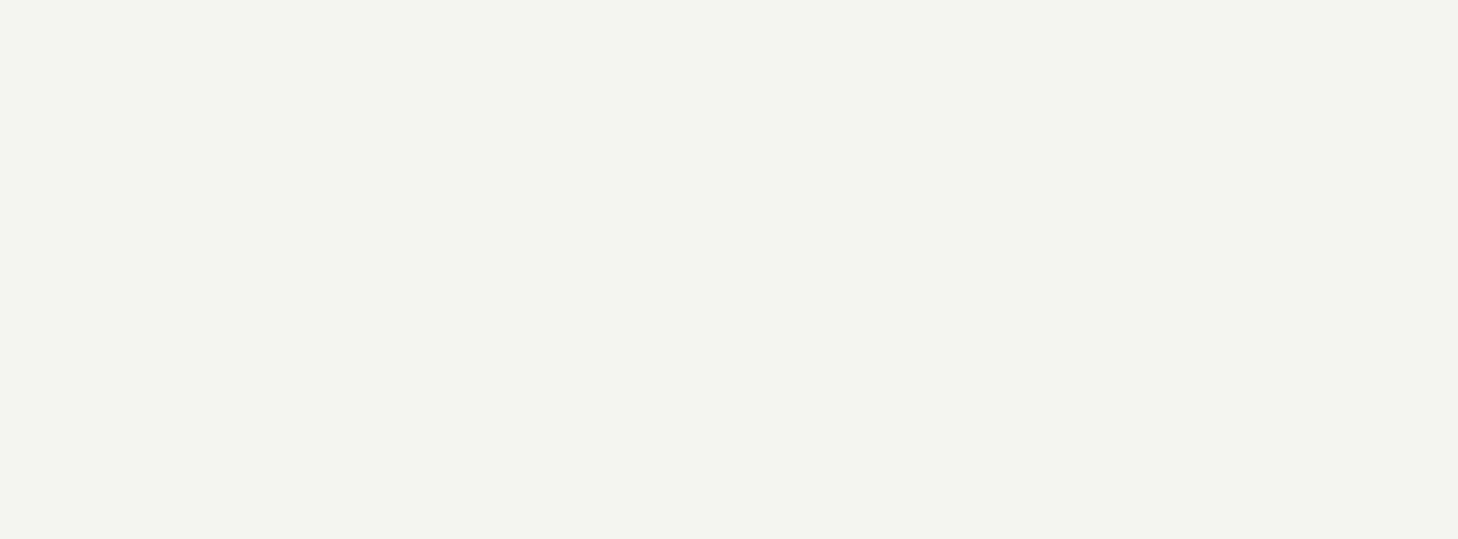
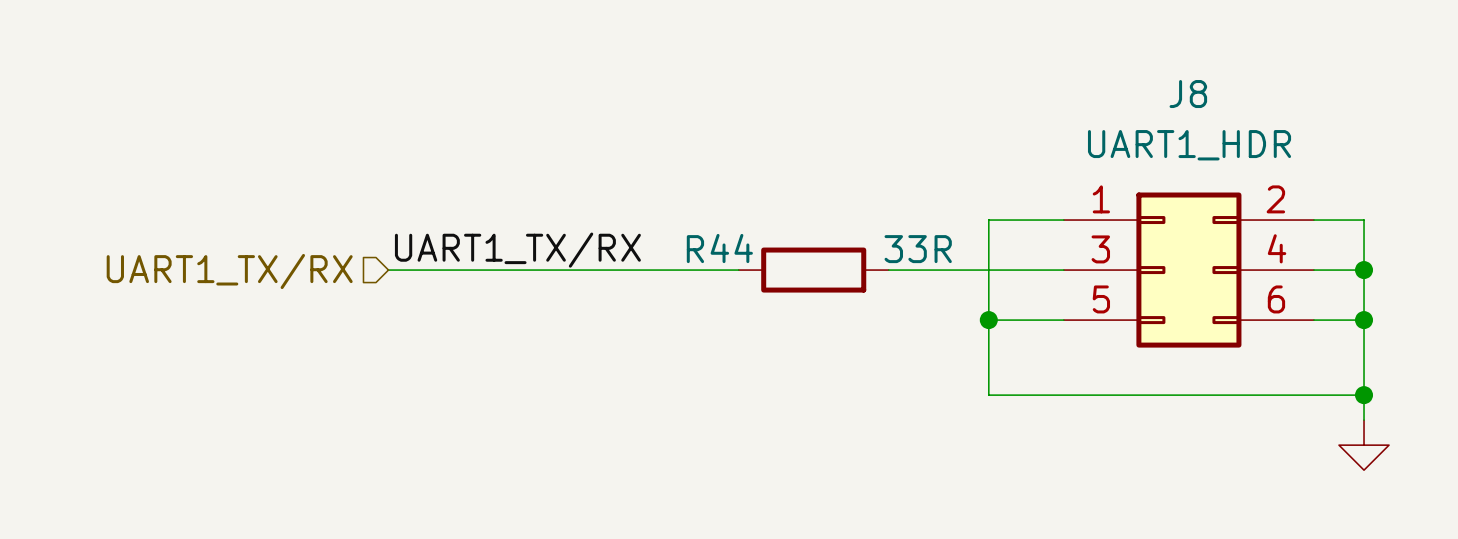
wire: none -> (1063, 220) (988, 220) (988, 395) (1364, 395)
wire: none -> (1313, 220) (1364, 220) (1364, 420)
label: none -> UART1_TX/RX (517, 250)
wire: none -> (388, 270) (738, 270)
R44: none -> 33R (813, 270)
wire: none -> (888, 270) (1063, 270)
J8: none -> UART1_HDR (1188, 270)
wire: none -> (1313, 270) (1364, 270)
junction: none -> (1364, 270)
hierarchical label: none -> UART1_TX/RX (229, 271)
wire: none -> (988, 320) (1063, 320)
junction: none -> (988, 320)
wire: none -> (1313, 320) (1364, 320)
junction: none -> (1364, 320)
junction: none -> (1364, 395)
power symbol: none -> (1364, 445)

